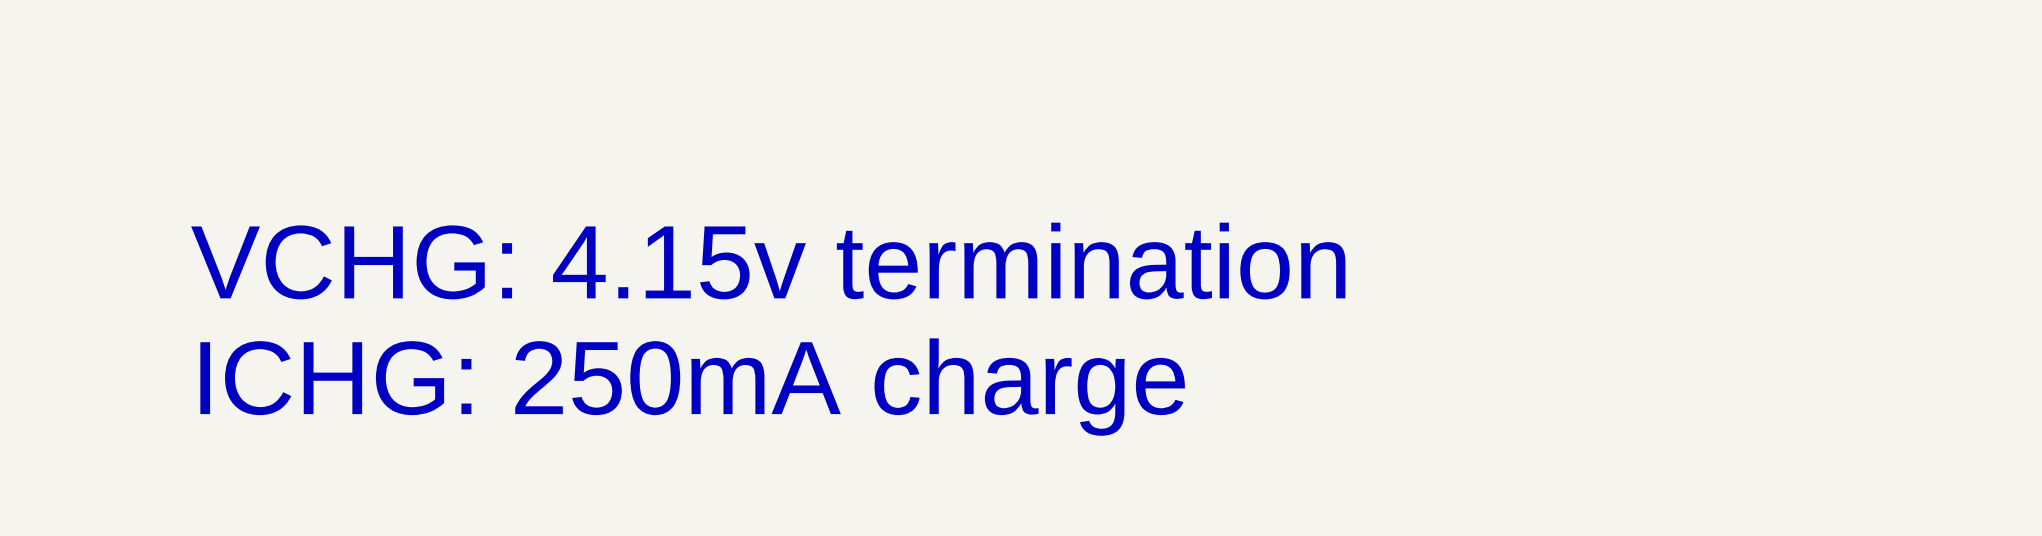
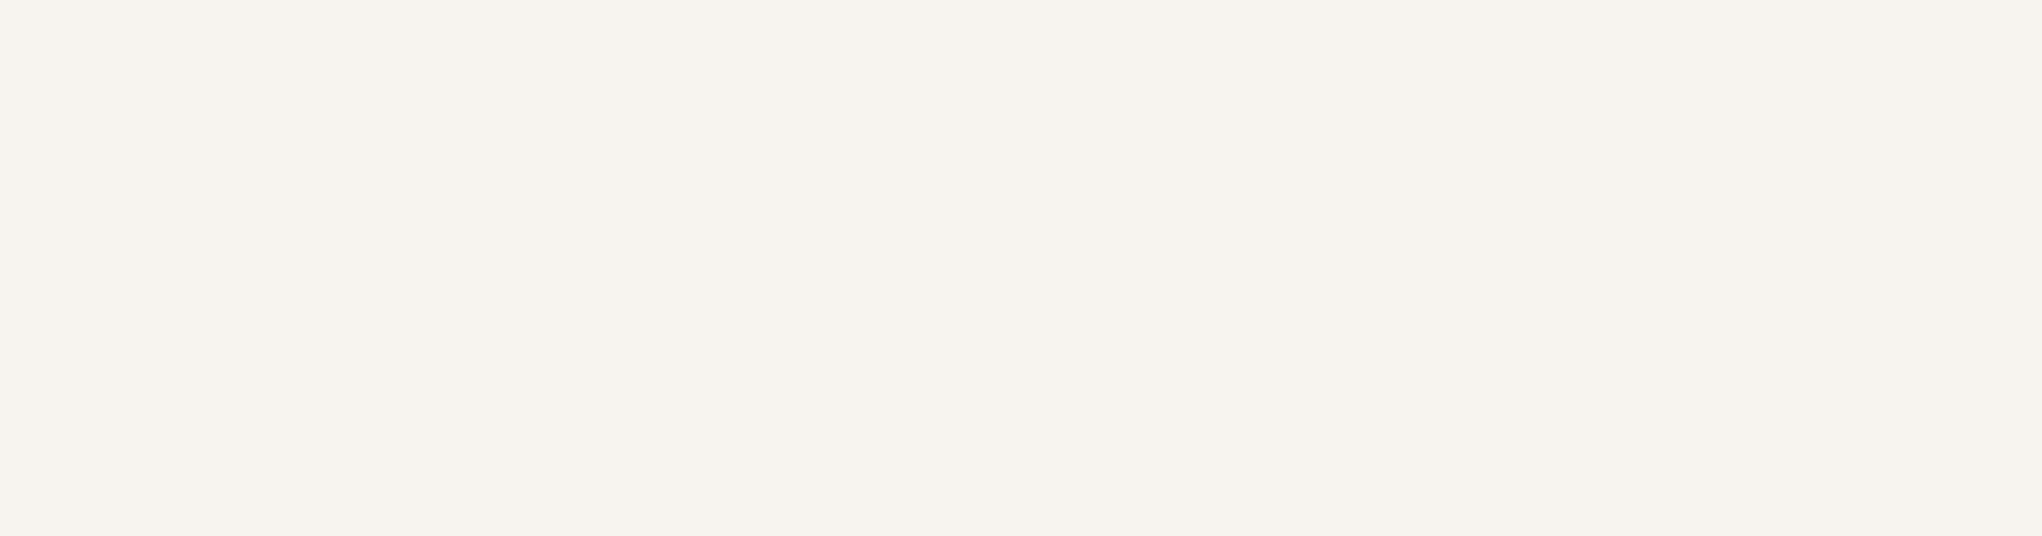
text: VCHG: 4.15v termination (768, 261) -> none
text: ICHG: 250mA charge (692, 387) -> none

